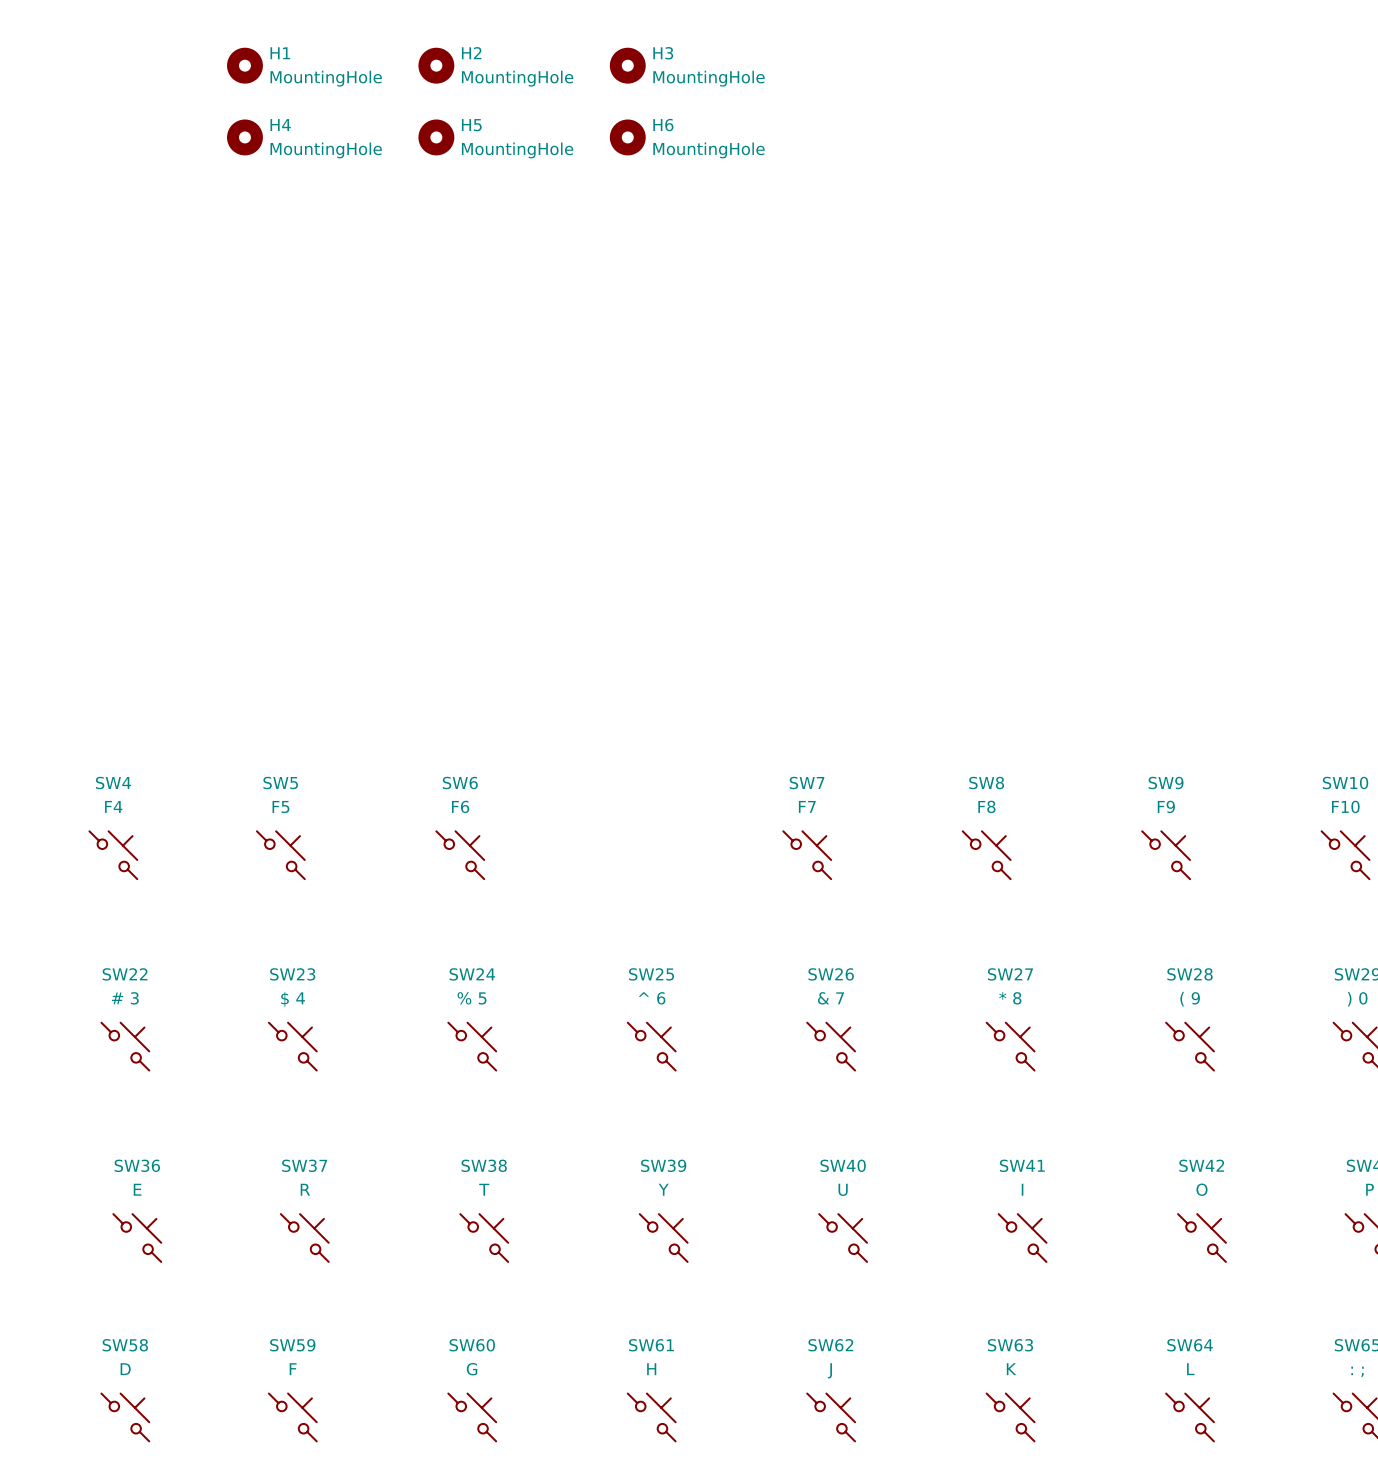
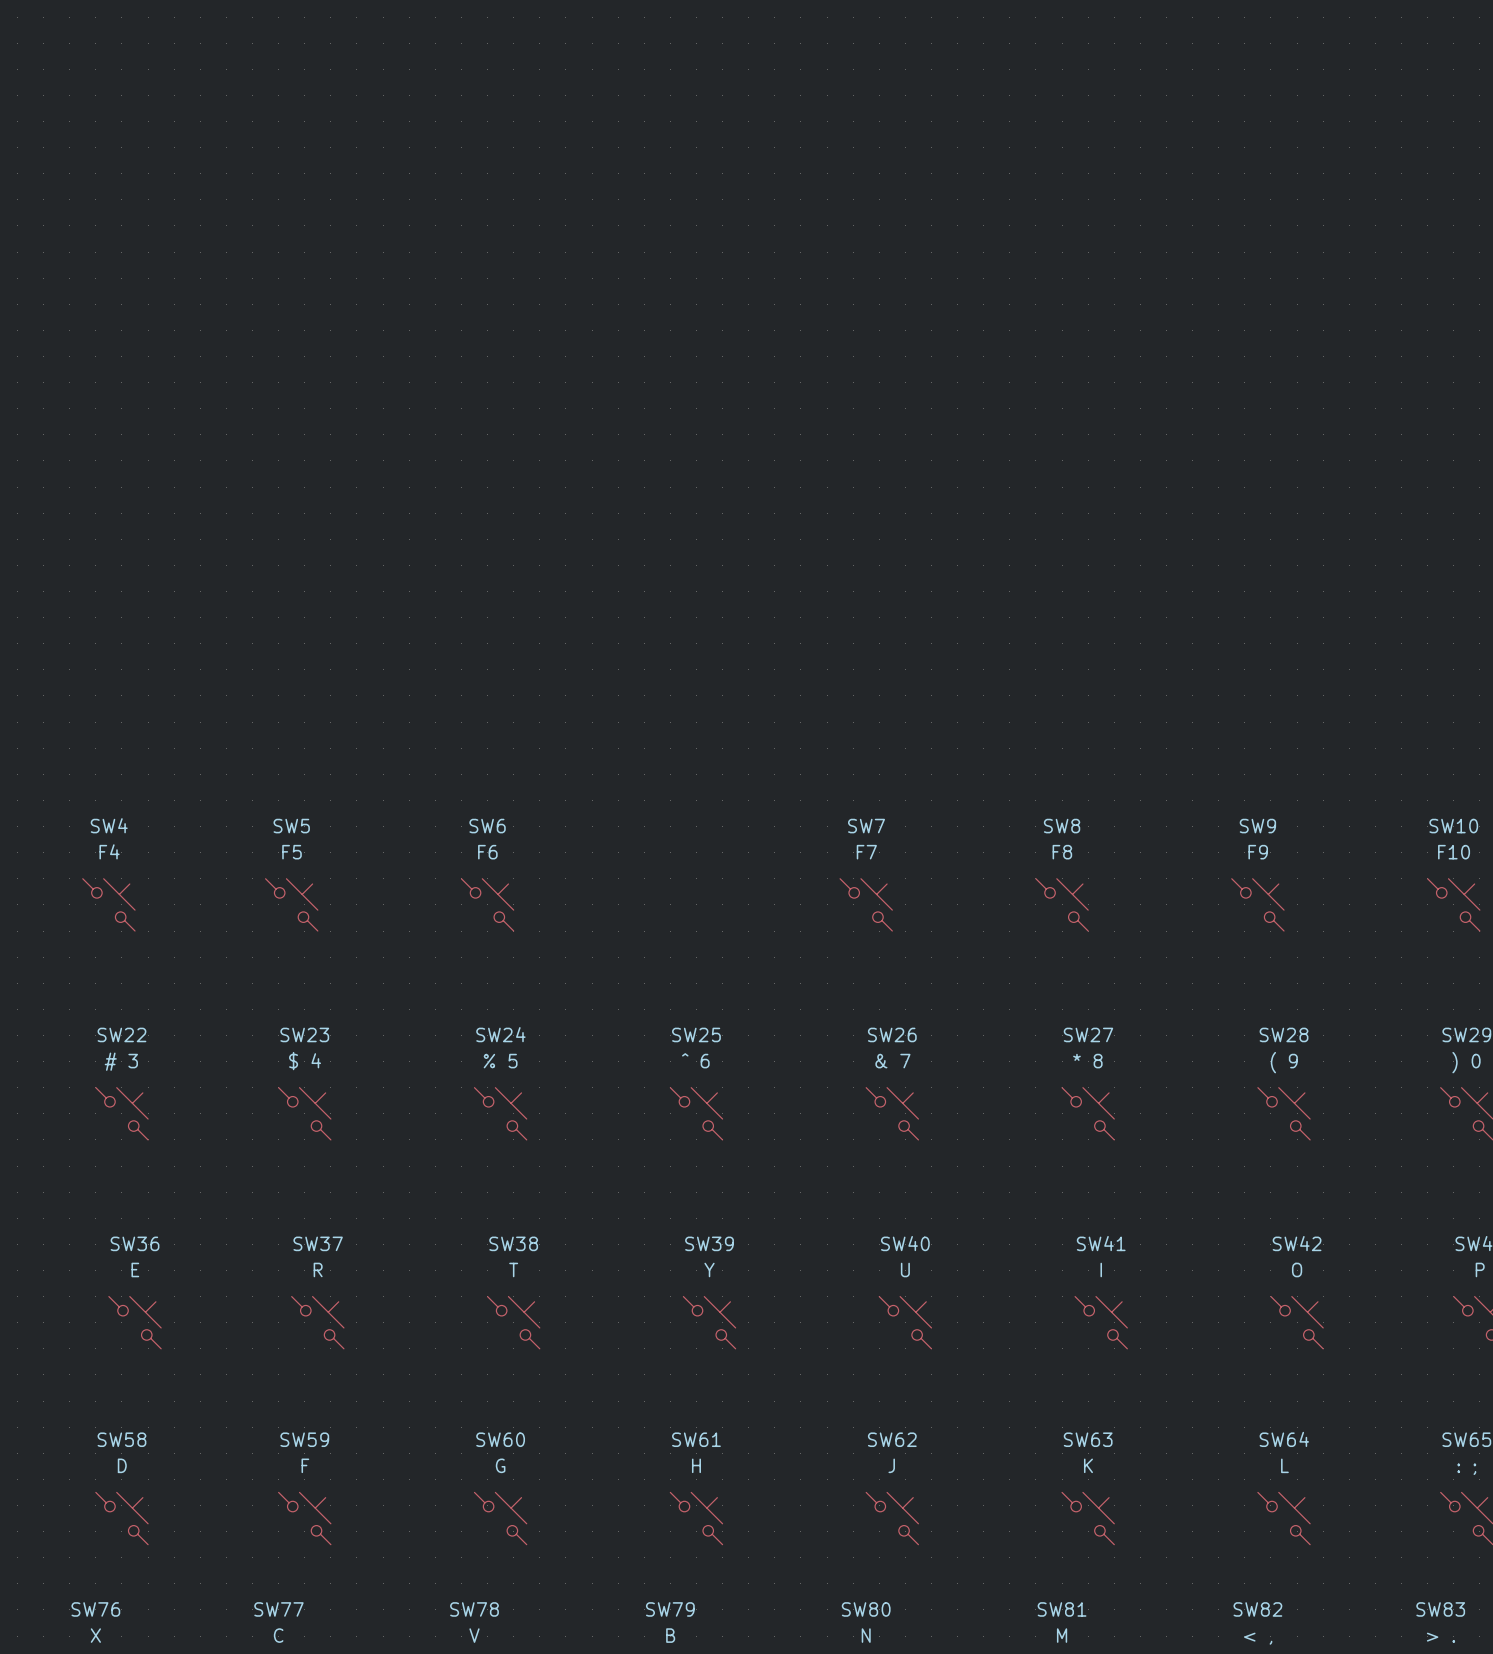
H1: MountingHole (244, 65) -> none
H2: MountingHole (436, 65) -> none
H3: MountingHole (627, 65) -> none
H4: MountingHole (244, 137) -> none
H5: MountingHole (436, 137) -> none
H6: MountingHole (627, 137) -> none

